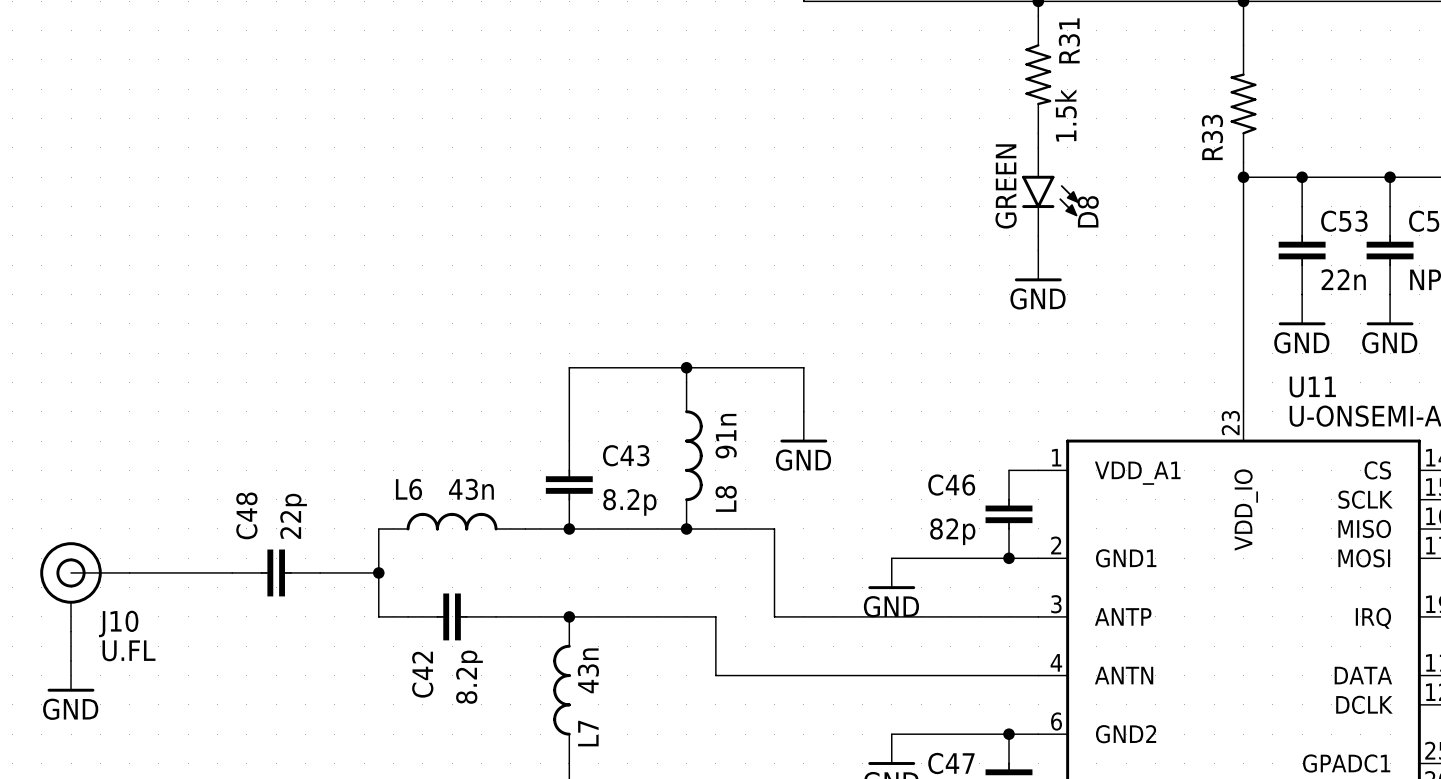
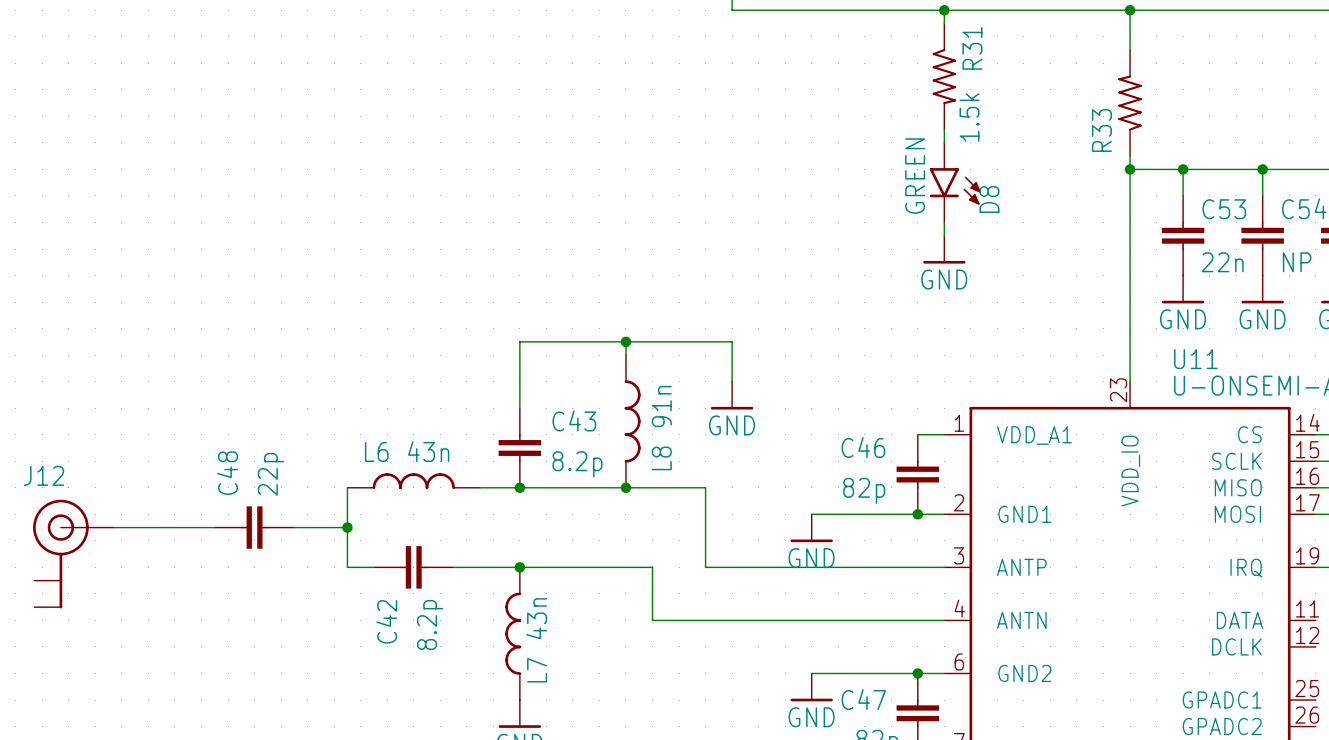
J10: U.FL (84, 586) -> none
J12: none -> (73, 554)
wire: (71, 631) (71, 660) -> none
power symbol: GND (71, 676) -> none

